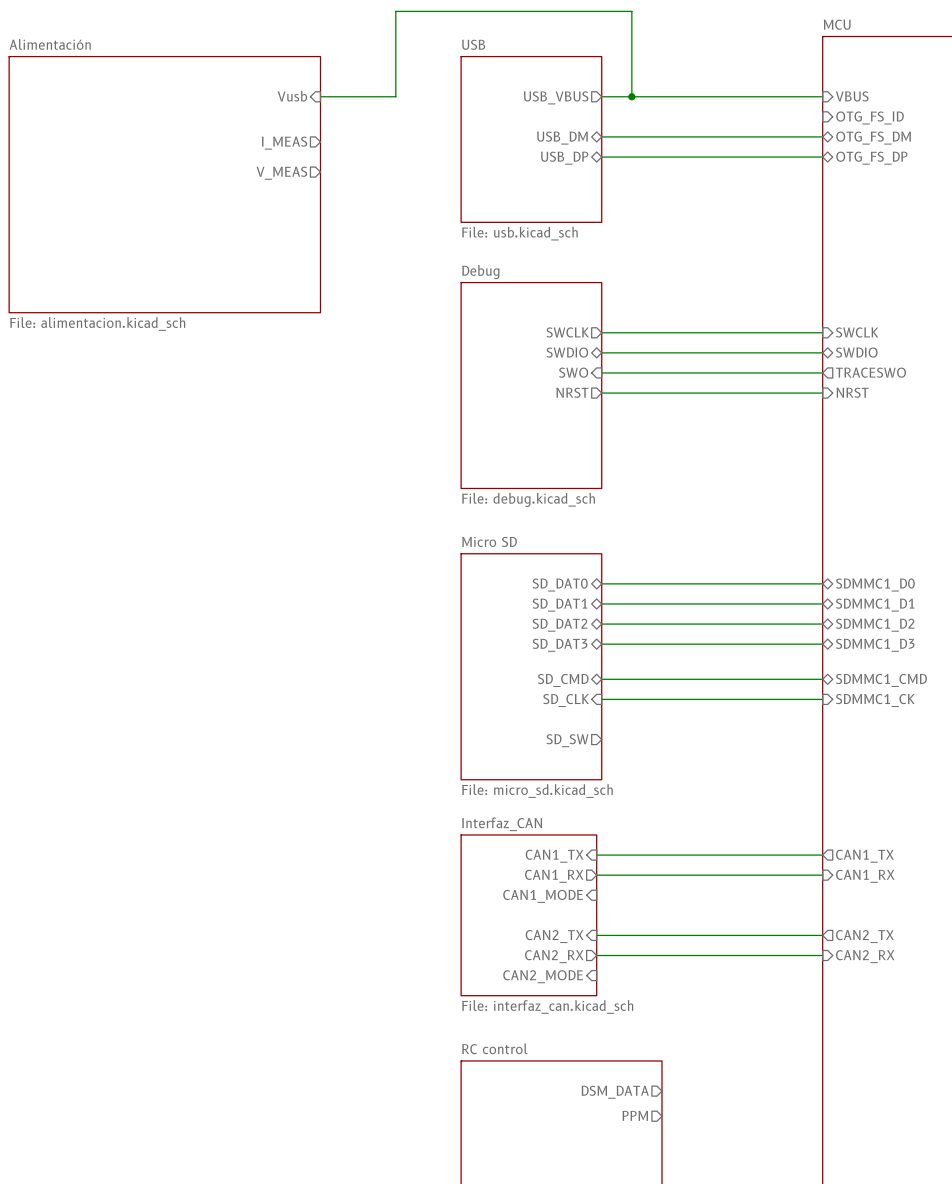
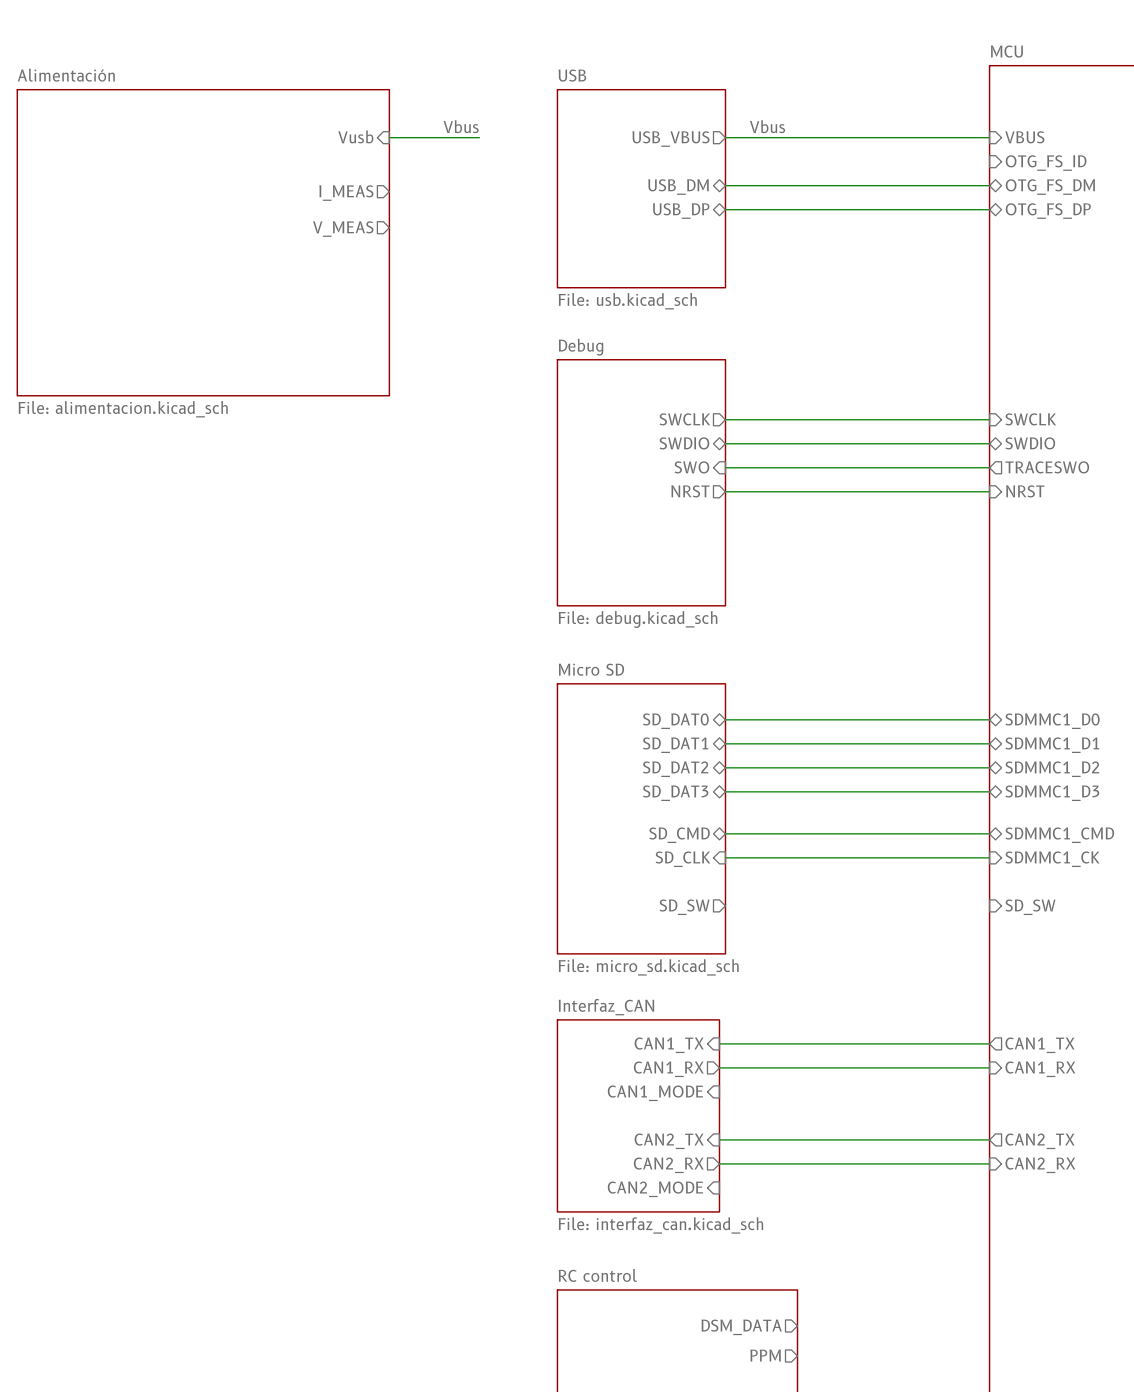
label: none -> Vbus (461, 126)
label: none -> Vbus (767, 126)
wire: (395, 96) (395, 11) (631, 11) (631, 96) -> none
junction: (631, 96) -> none
sheet pin: none -> SD_SW (1030, 907)

